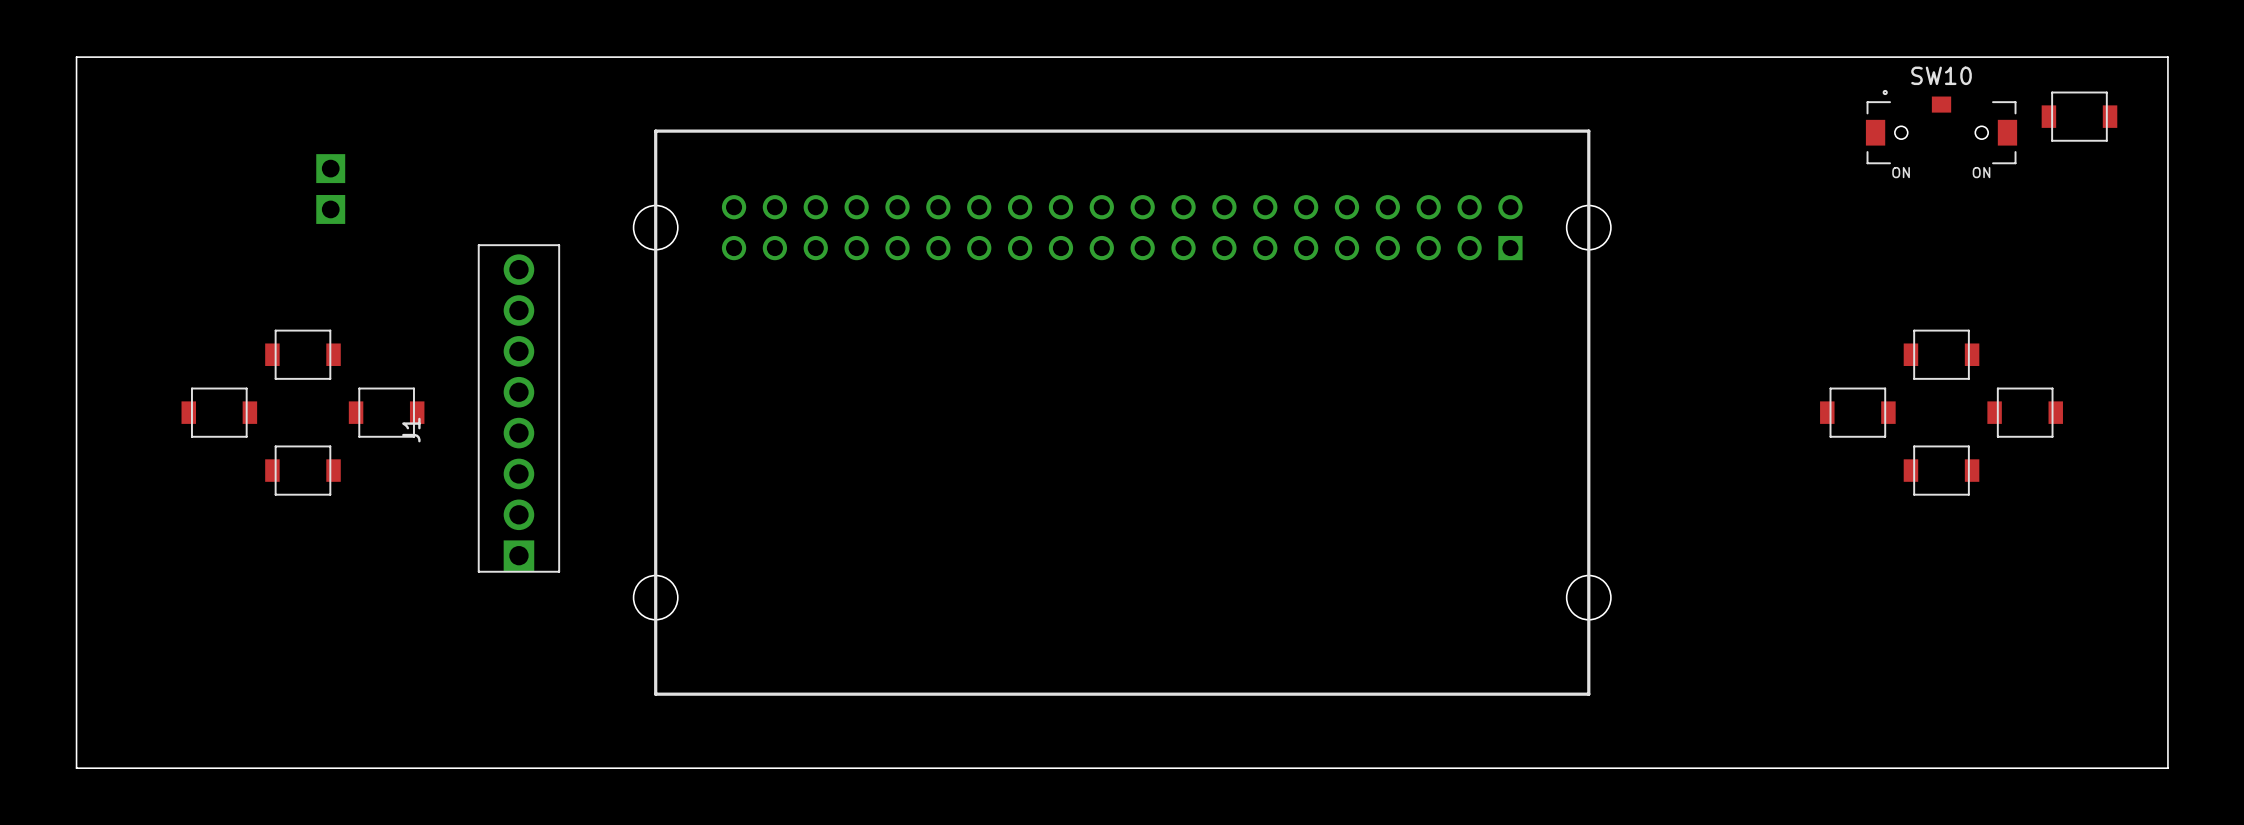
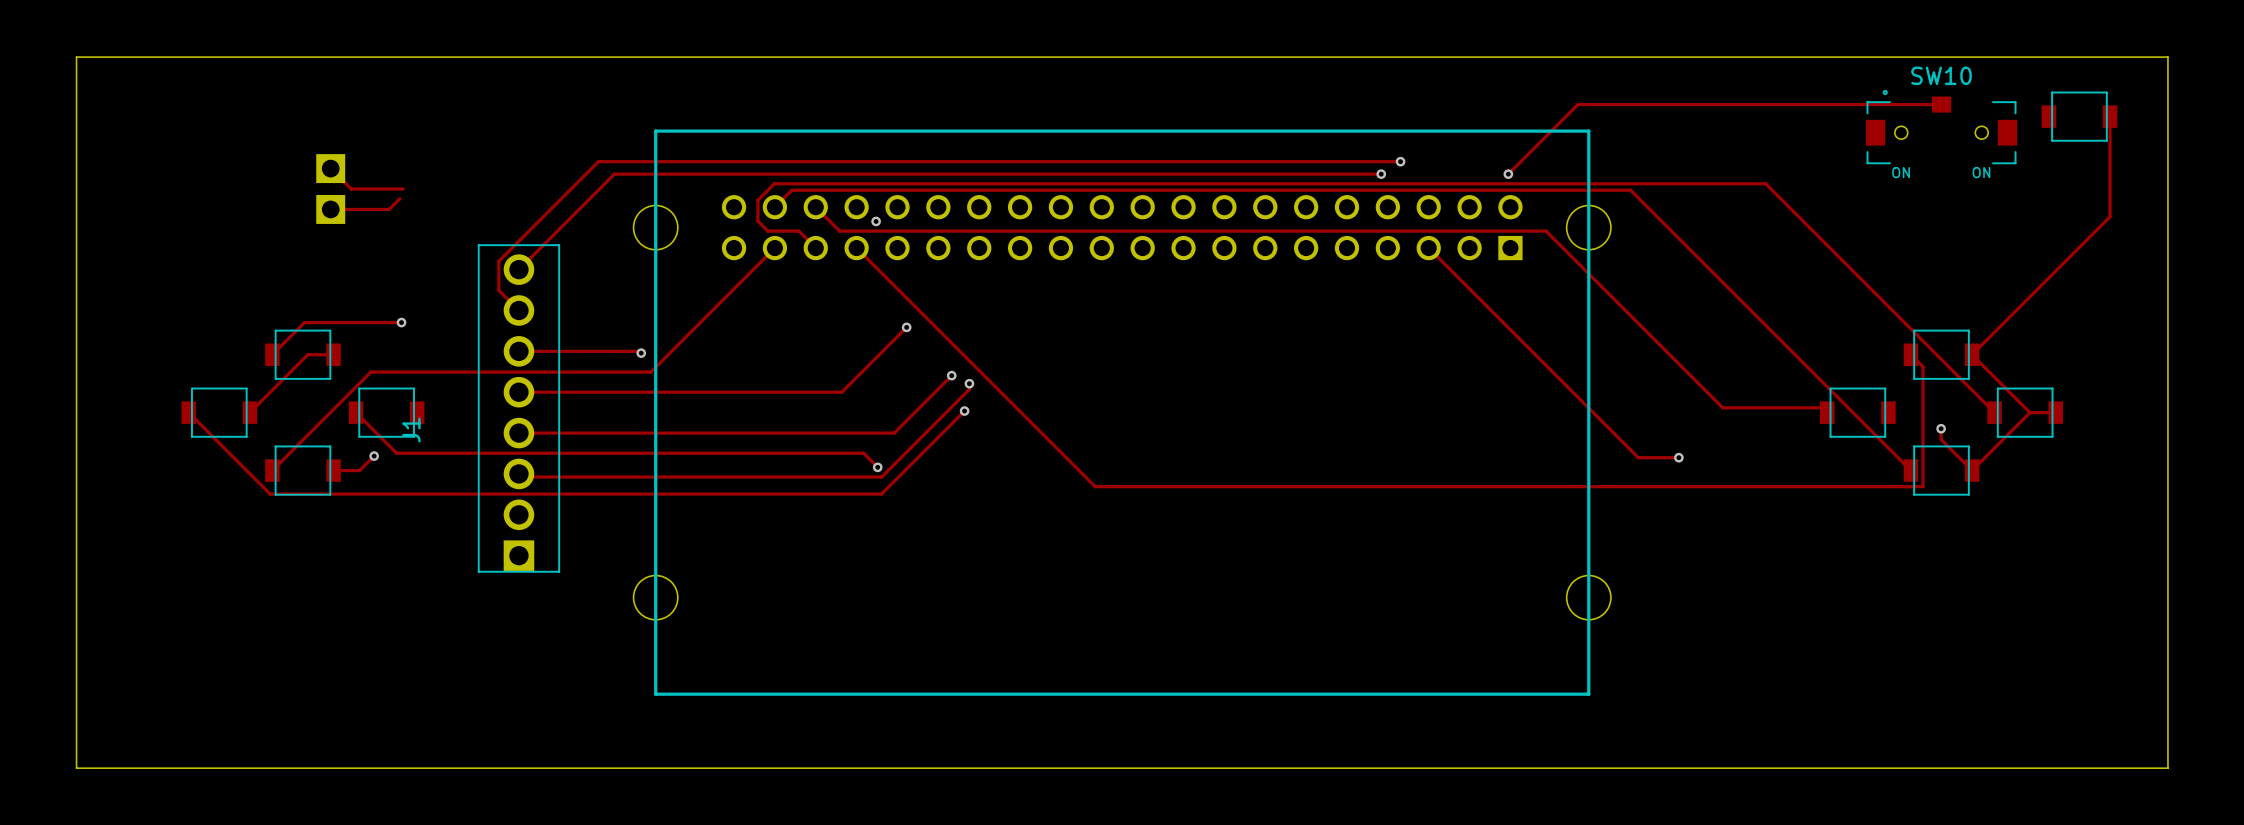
track: none -> (1941, 104) (1577, 104) (1508, 174)
track: none -> (2110, 116) (2110, 216) (1972, 354) (2030, 412)
track: none -> (1400, 161) (598, 161) (498, 261) (498, 290) (518, 310)
via: none -> (1400, 161)
track: none -> (330, 168) (351, 189) (403, 189)
track: none -> (1381, 174) (614, 174) (518, 269)
via: none -> (1381, 174)
via: none -> (1508, 174)
track: none -> (399, 198) (389, 209) (330, 209)
track: none -> (774, 207) (791, 190) (1630, 190) (1910, 470)
track: none -> (815, 207) (839, 231) (1546, 231) (1722, 407) (1828, 407) (1827, 412)
via: none -> (876, 221)
track: none -> (774, 248) (650, 372) (370, 372) (272, 470)
track: none -> (815, 248) (798, 231) (767, 231) (757, 221) (757, 200) (774, 183) (1765, 183) (1994, 412)
track: none -> (856, 248) (1095, 486) (1923, 486) (1923, 366) (1910, 354)
track: none -> (1428, 248) (1638, 457) (1678, 457)
track: none -> (401, 322) (304, 322) (272, 354)
via: none -> (401, 322)
track: none -> (906, 327) (841, 392) (518, 392)
via: none -> (906, 327)
track: none -> (518, 351) (639, 351) (641, 353)
via: none -> (641, 353)
track: none -> (333, 354) (307, 354) (249, 412)
track: none -> (951, 375) (894, 433) (518, 433)
via: none -> (951, 375)
track: none -> (969, 383) (969, 389) (881, 477) (522, 477) (518, 473)
via: none -> (969, 383)
track: none -> (964, 411) (881, 494) (270, 494) (188, 412)
via: none -> (964, 411)
track: none -> (356, 412) (396, 453) (863, 453) (877, 467)
track: none -> (2030, 412) (2055, 412)
track: none -> (2030, 412) (1972, 470) (1941, 439) (1941, 428)
via: none -> (1941, 428)
track: none -> (374, 456) (359, 470) (333, 470)
via: none -> (374, 456)
via: none -> (1678, 457)
via: none -> (877, 467)

